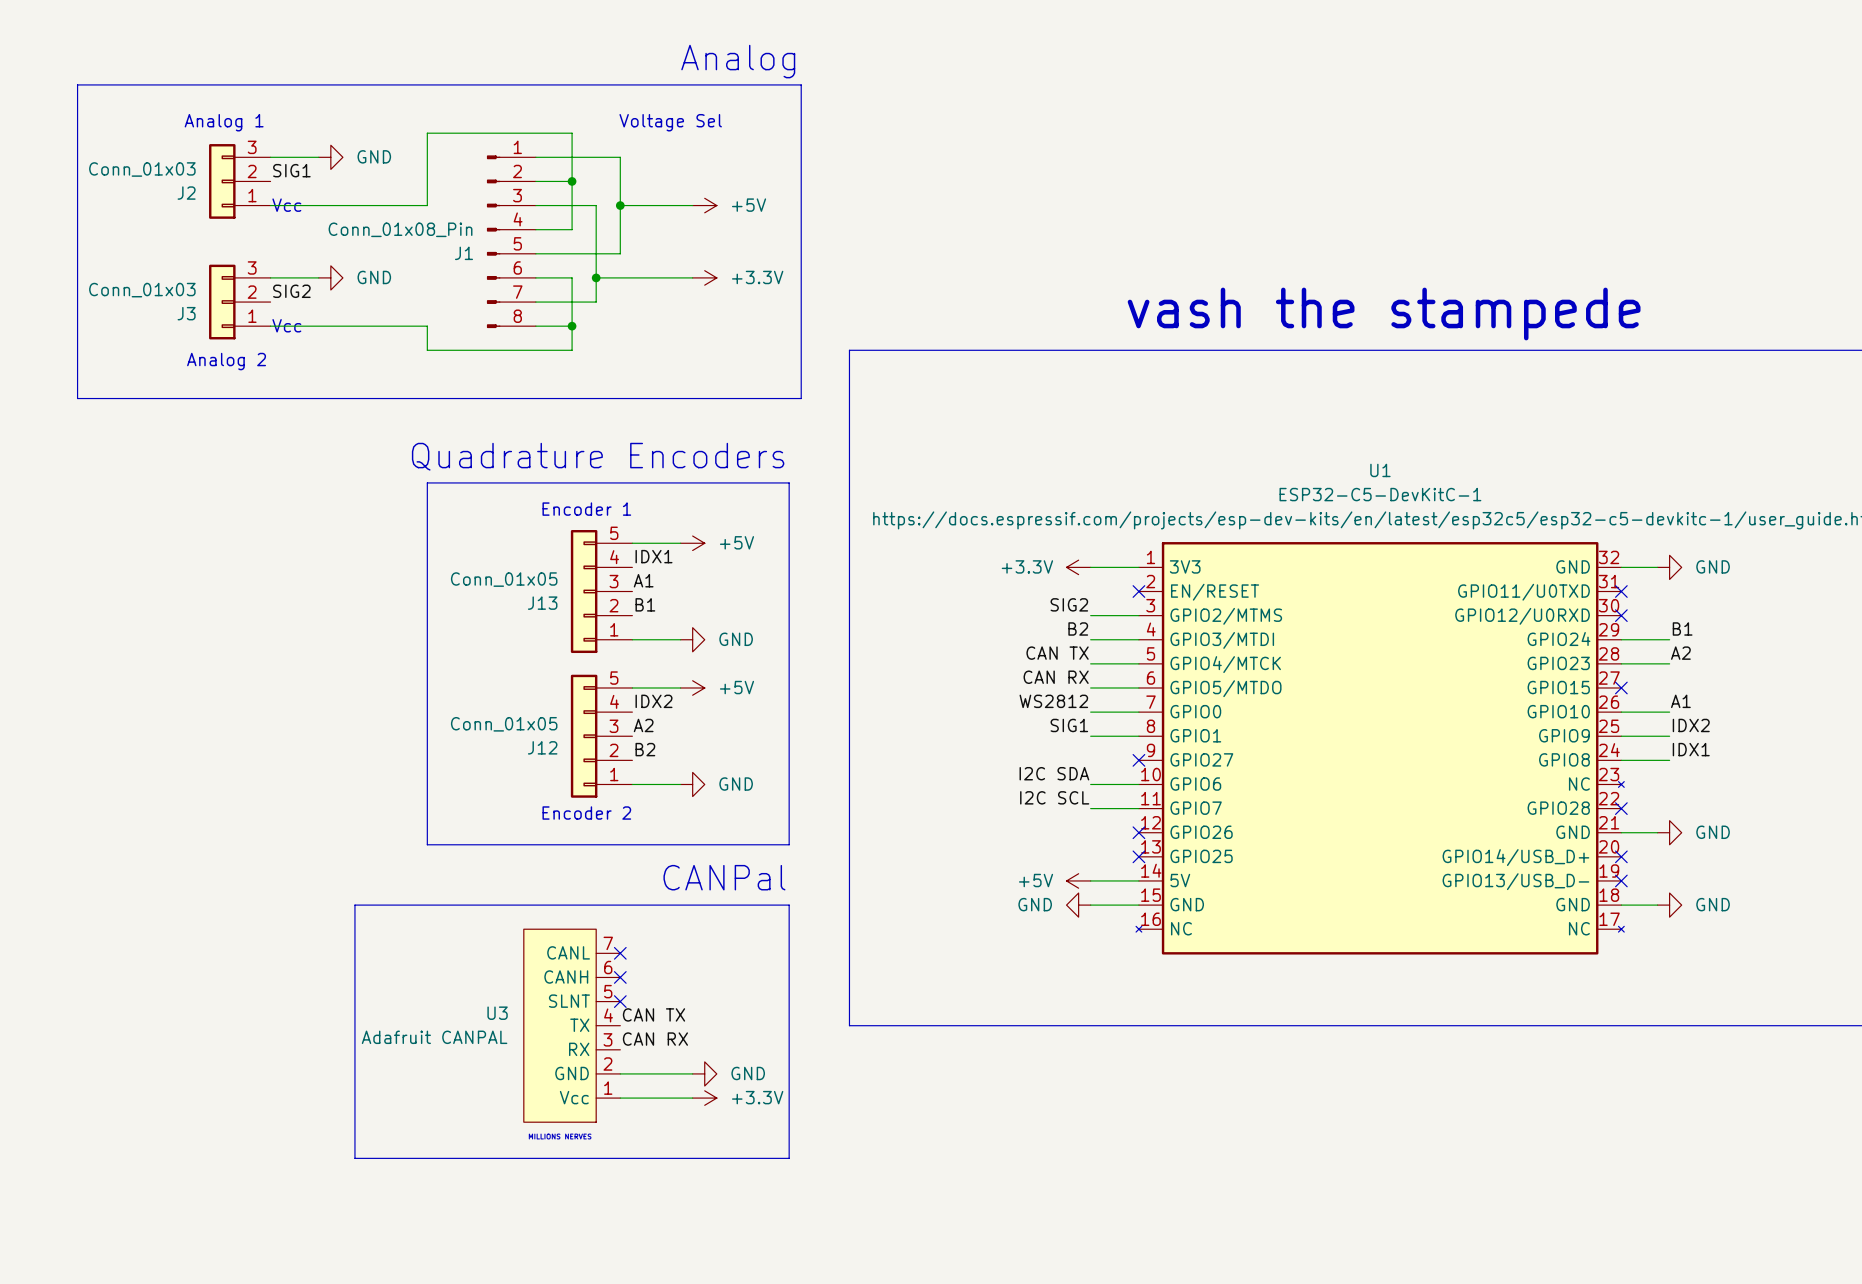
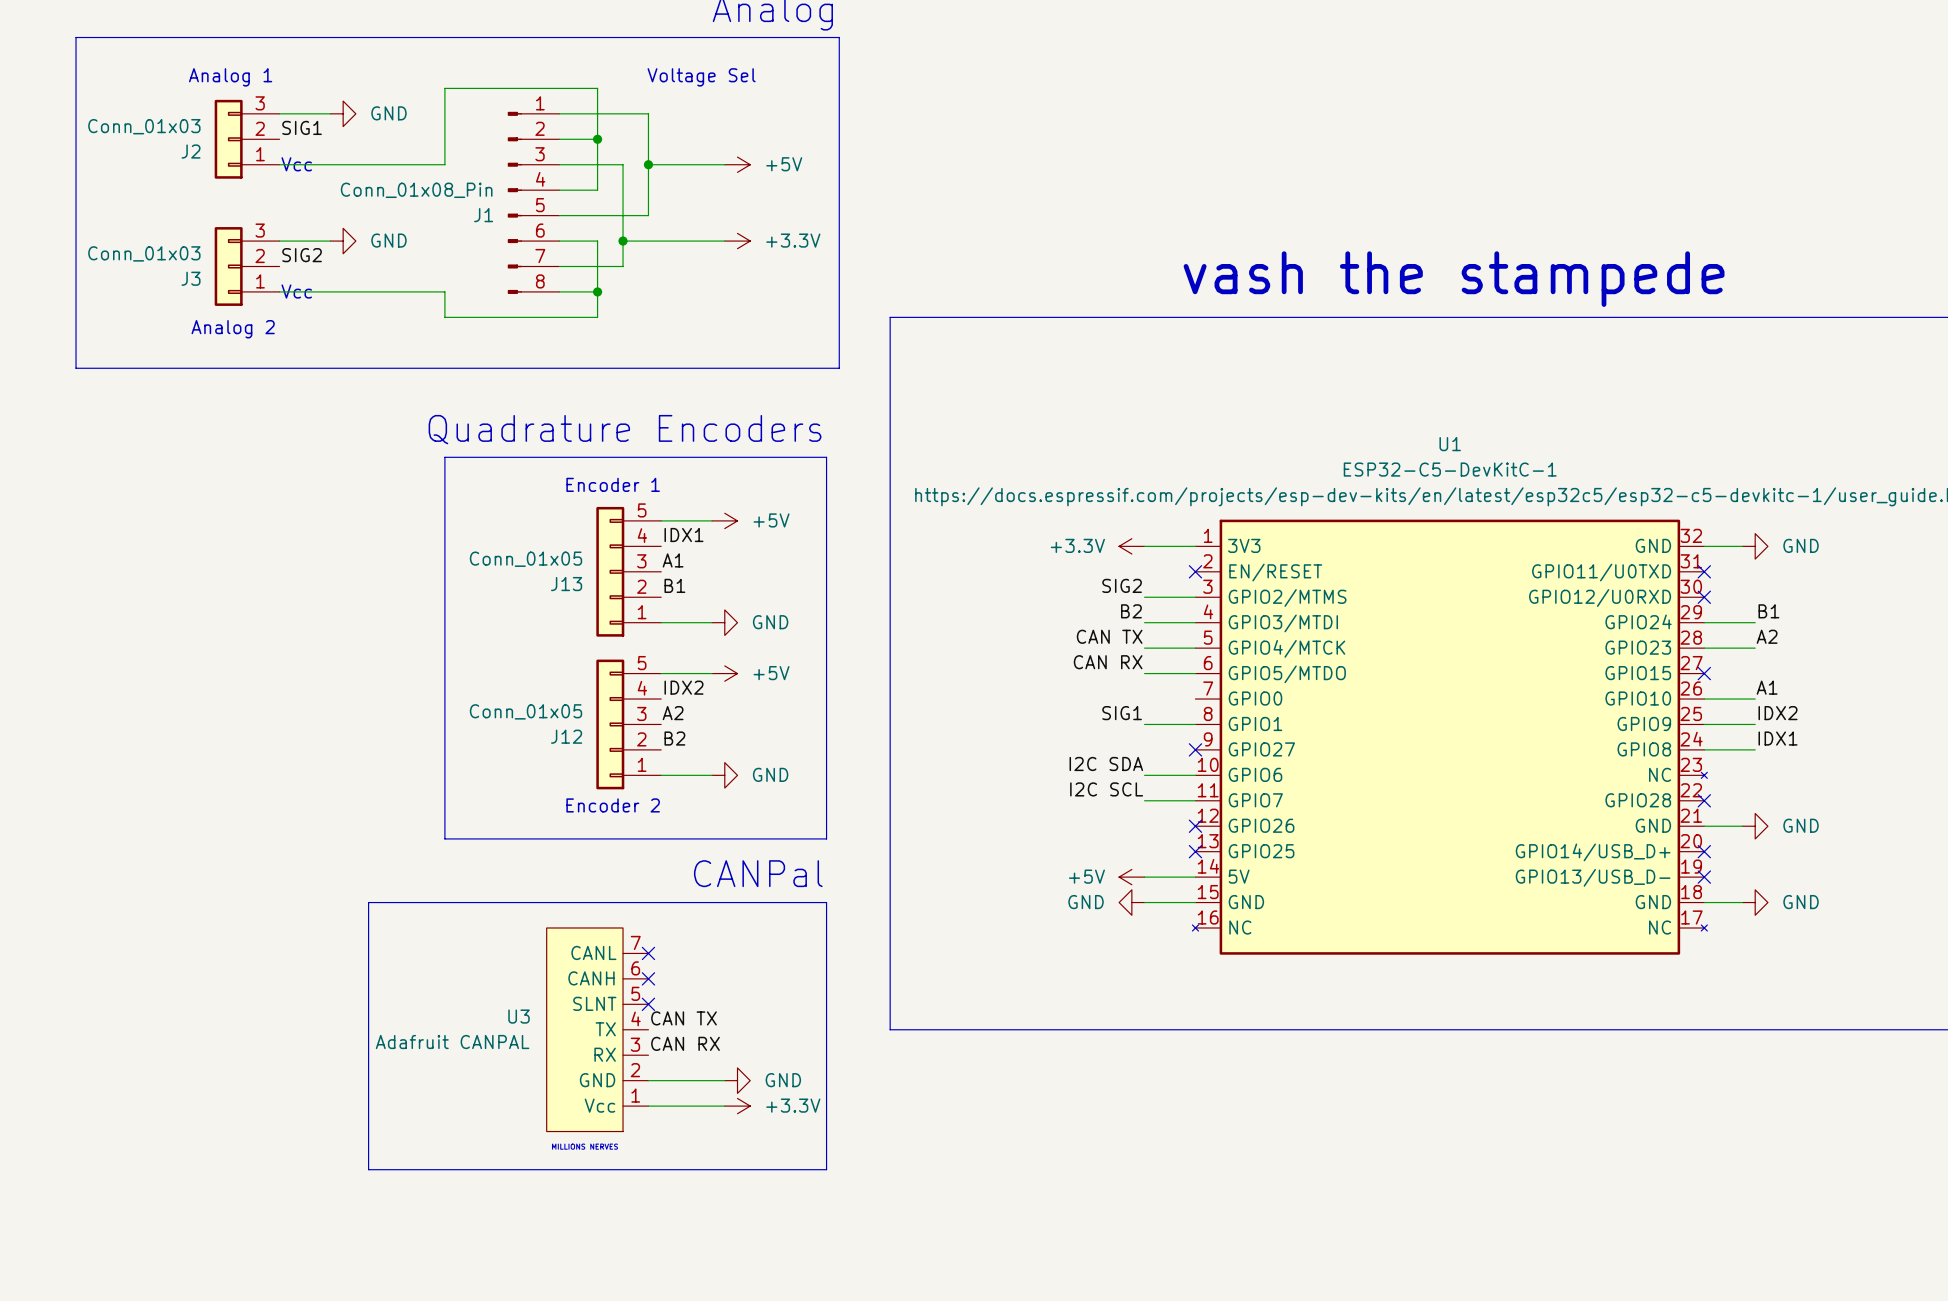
label: WS2812 (1053, 701) -> none
wire: (1090, 712) (1138, 712) -> none

